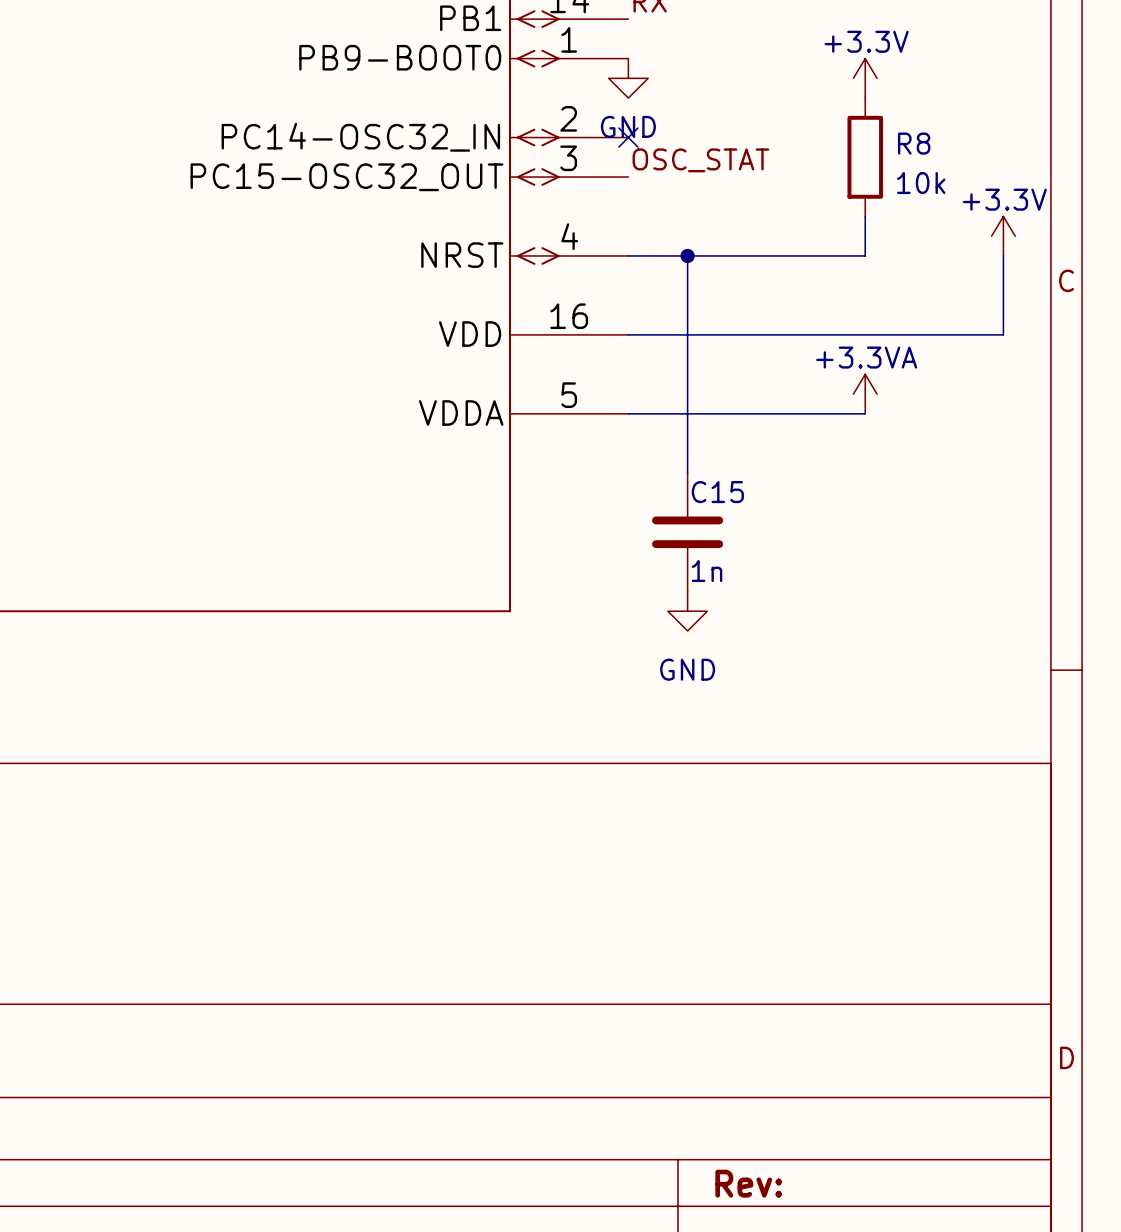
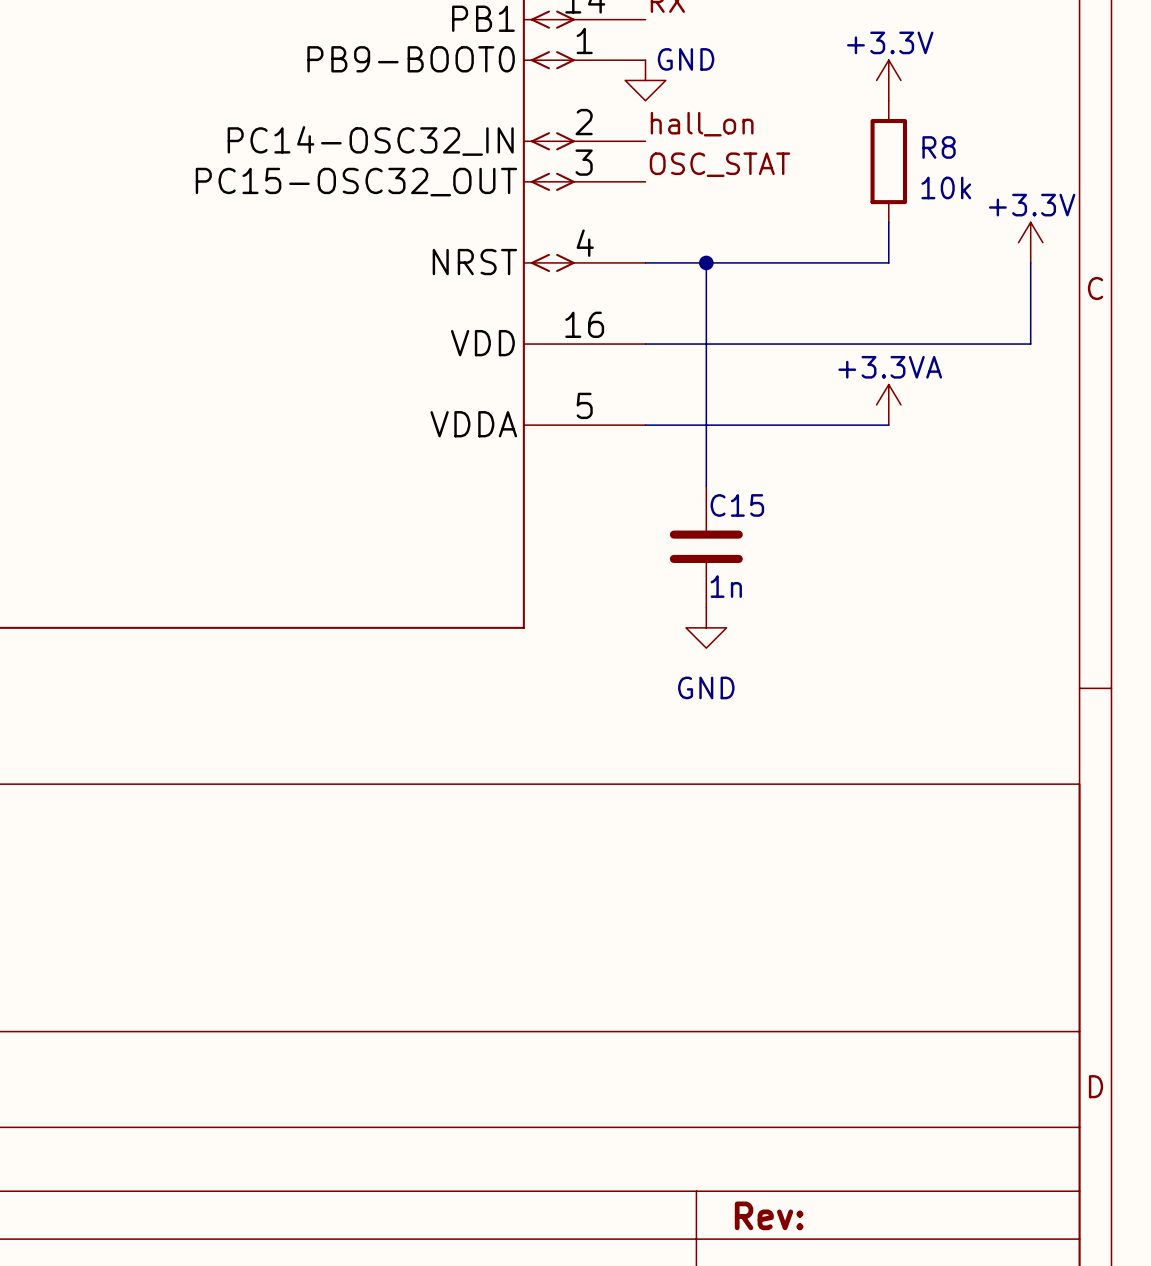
label: none -> hall_on (702, 124)
power symbol text position: GND (628, 126) -> GND (686, 59)
no-connect mark: (628, 137) -> none

